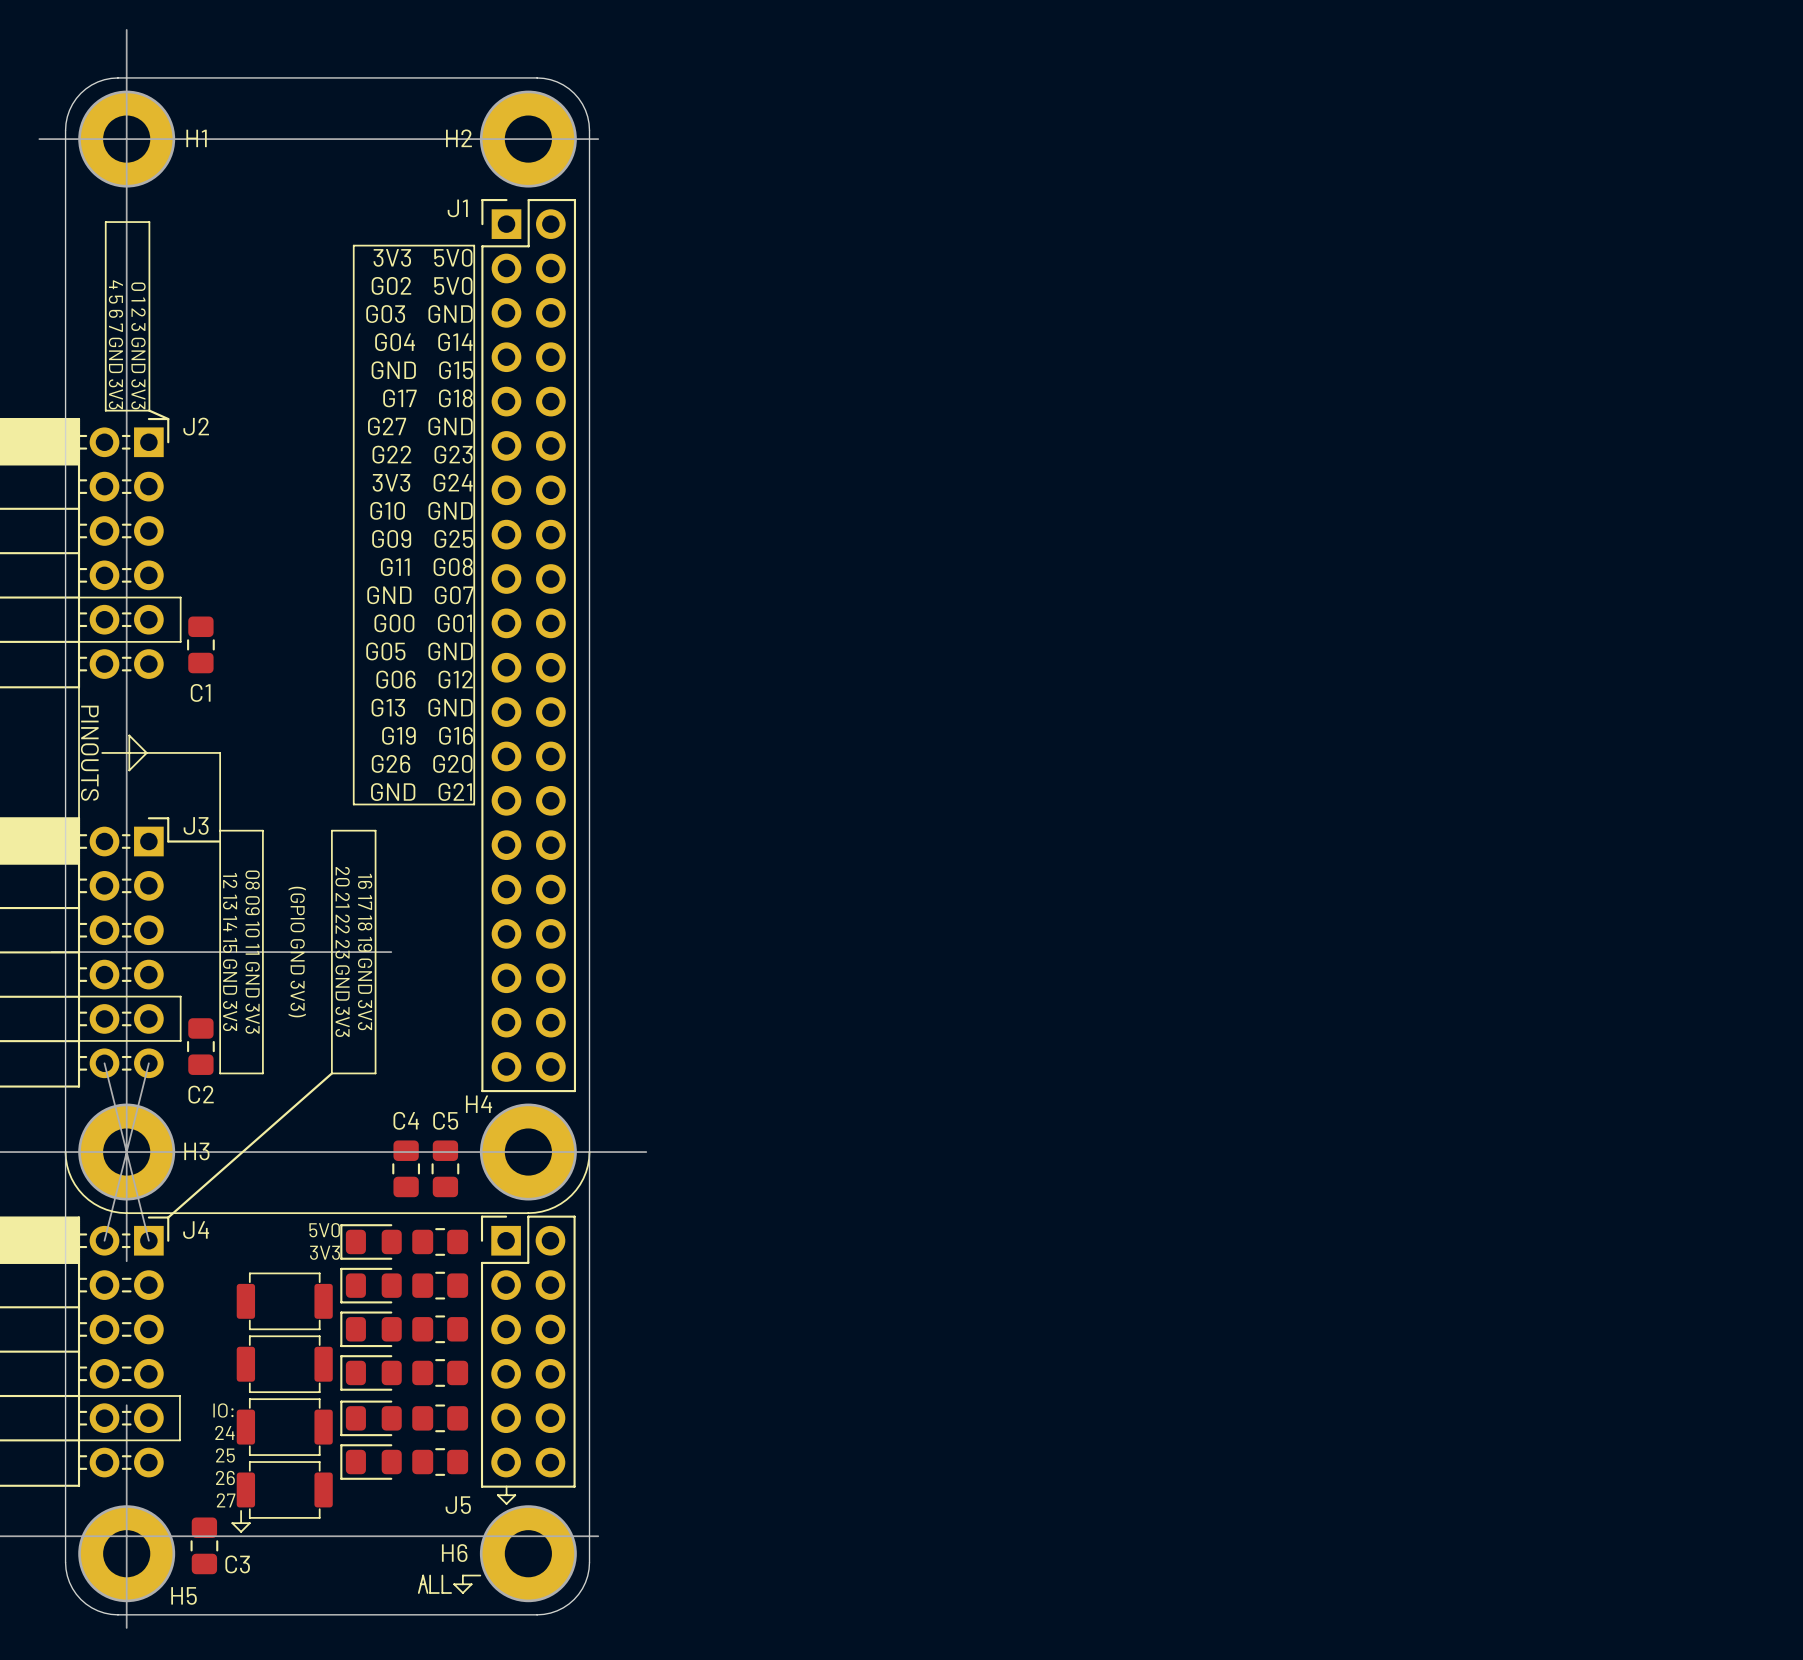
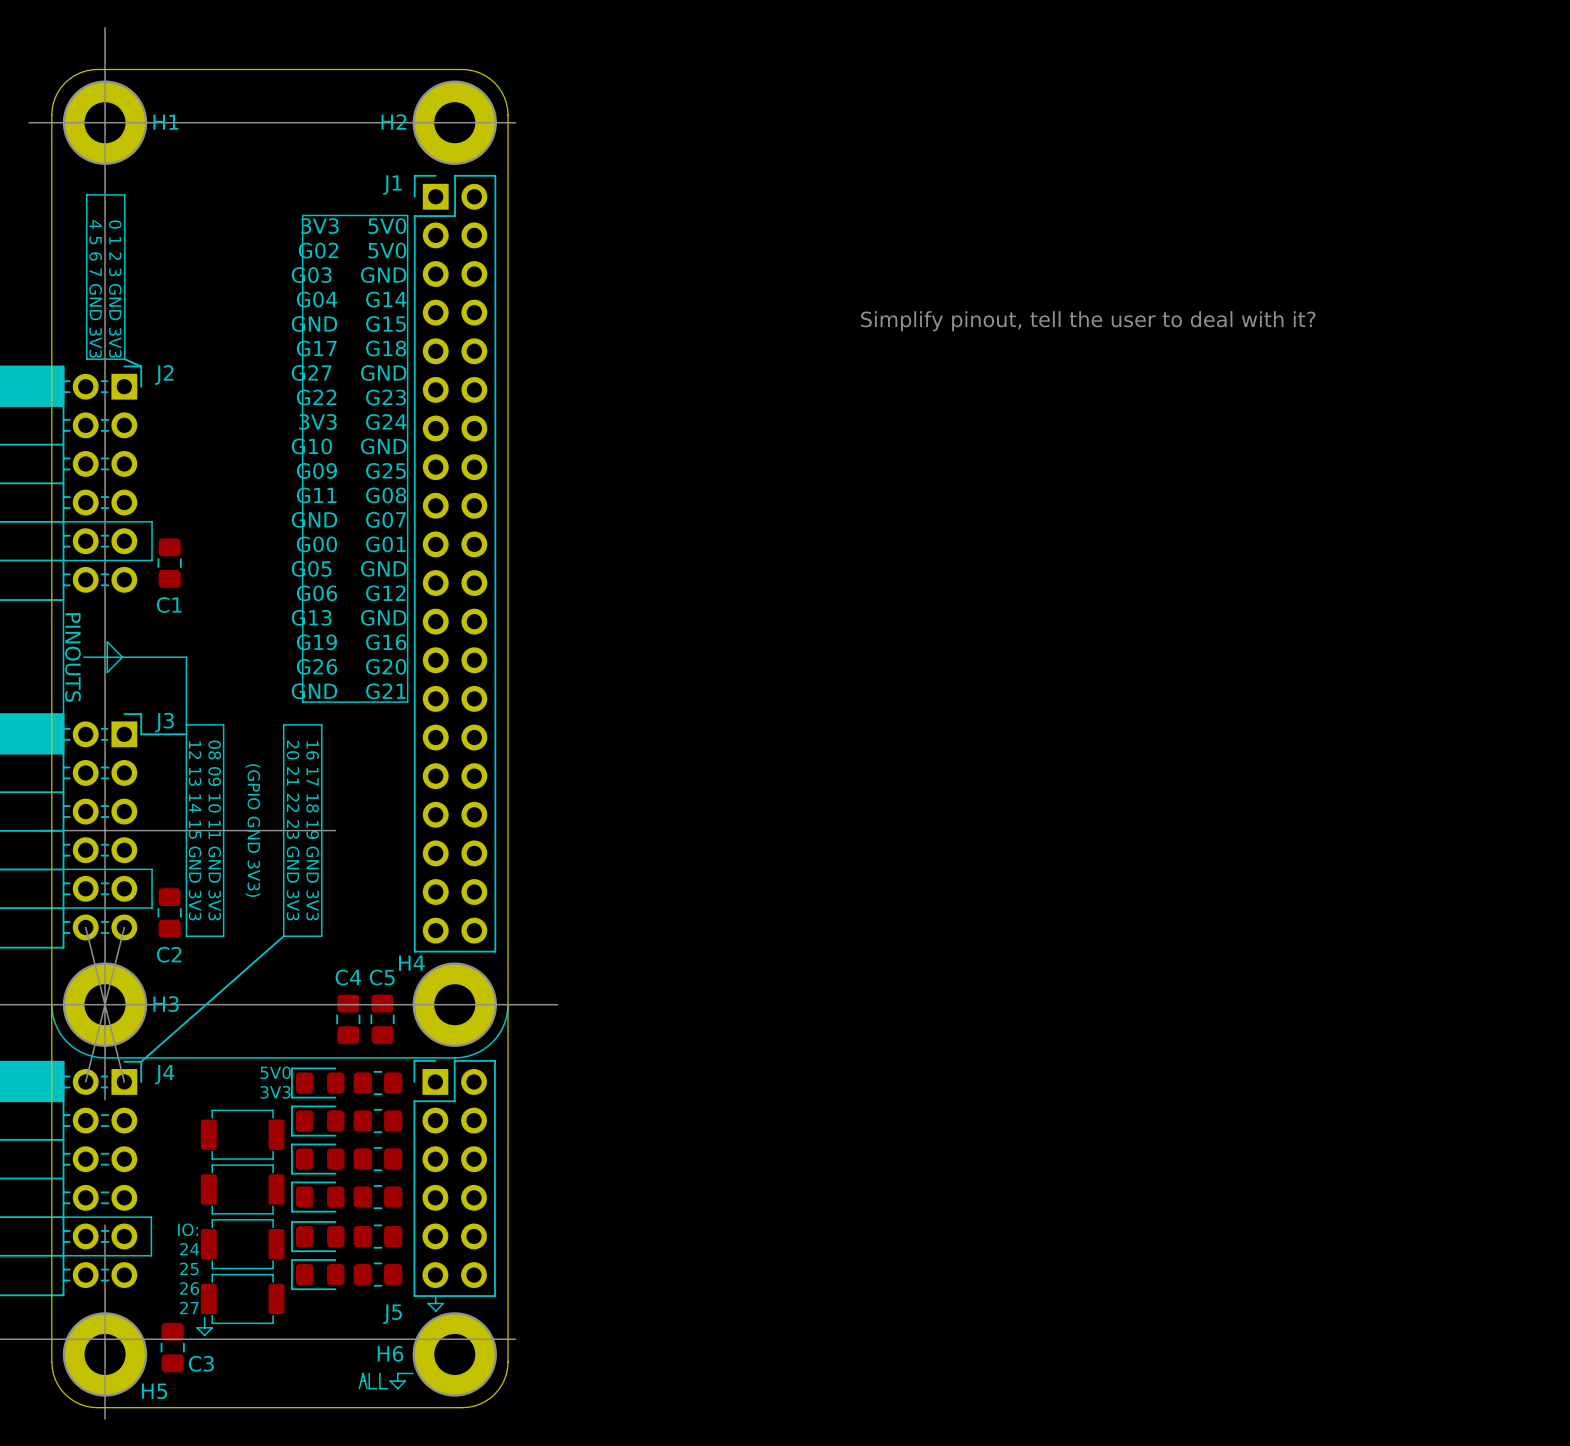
text: none -> Simplify pinout, tell the user to deal with it? (1088, 321)

